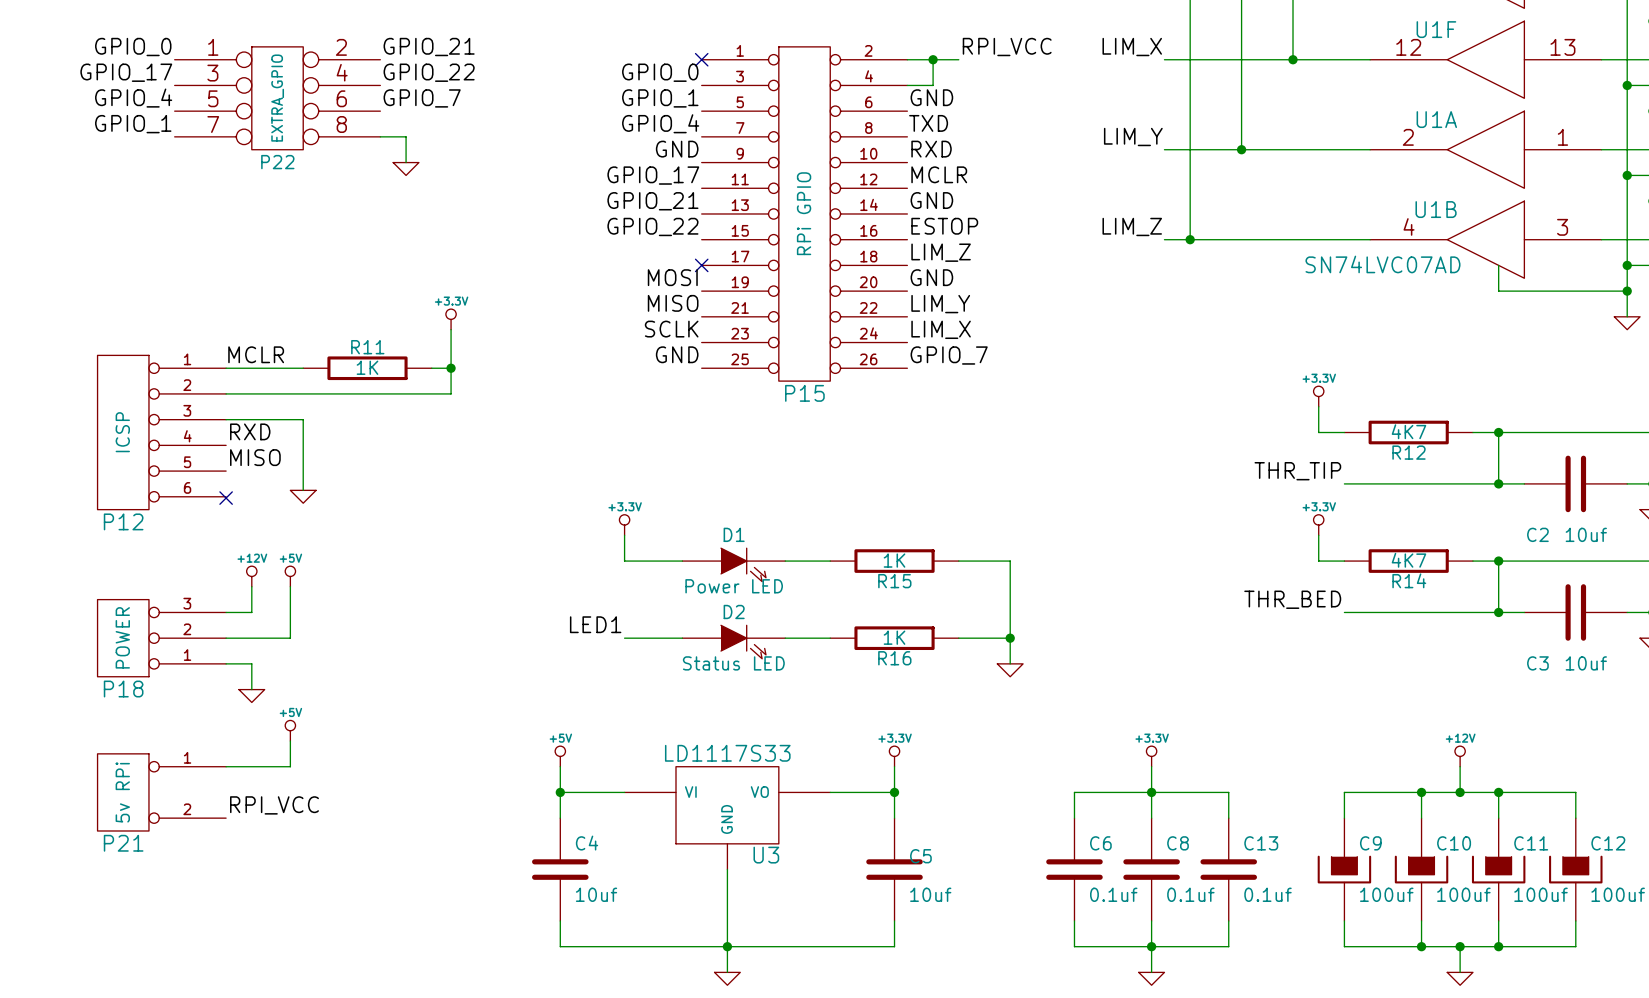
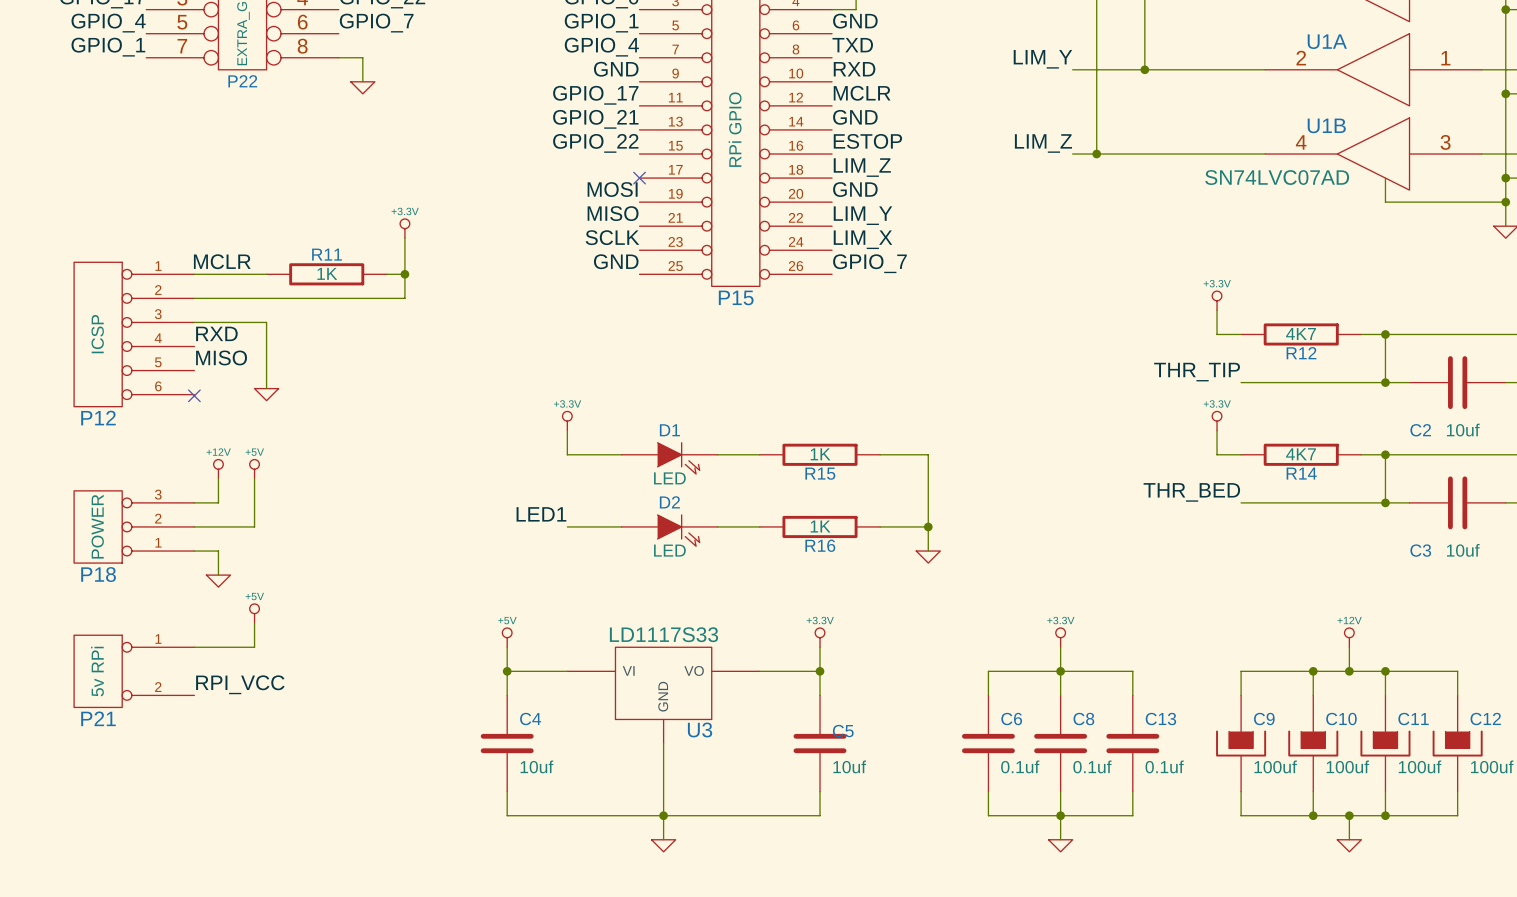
D1 value: Power LED (734, 586) -> LED (669, 478)
D2 value: Status LED (733, 663) -> LED (669, 550)

